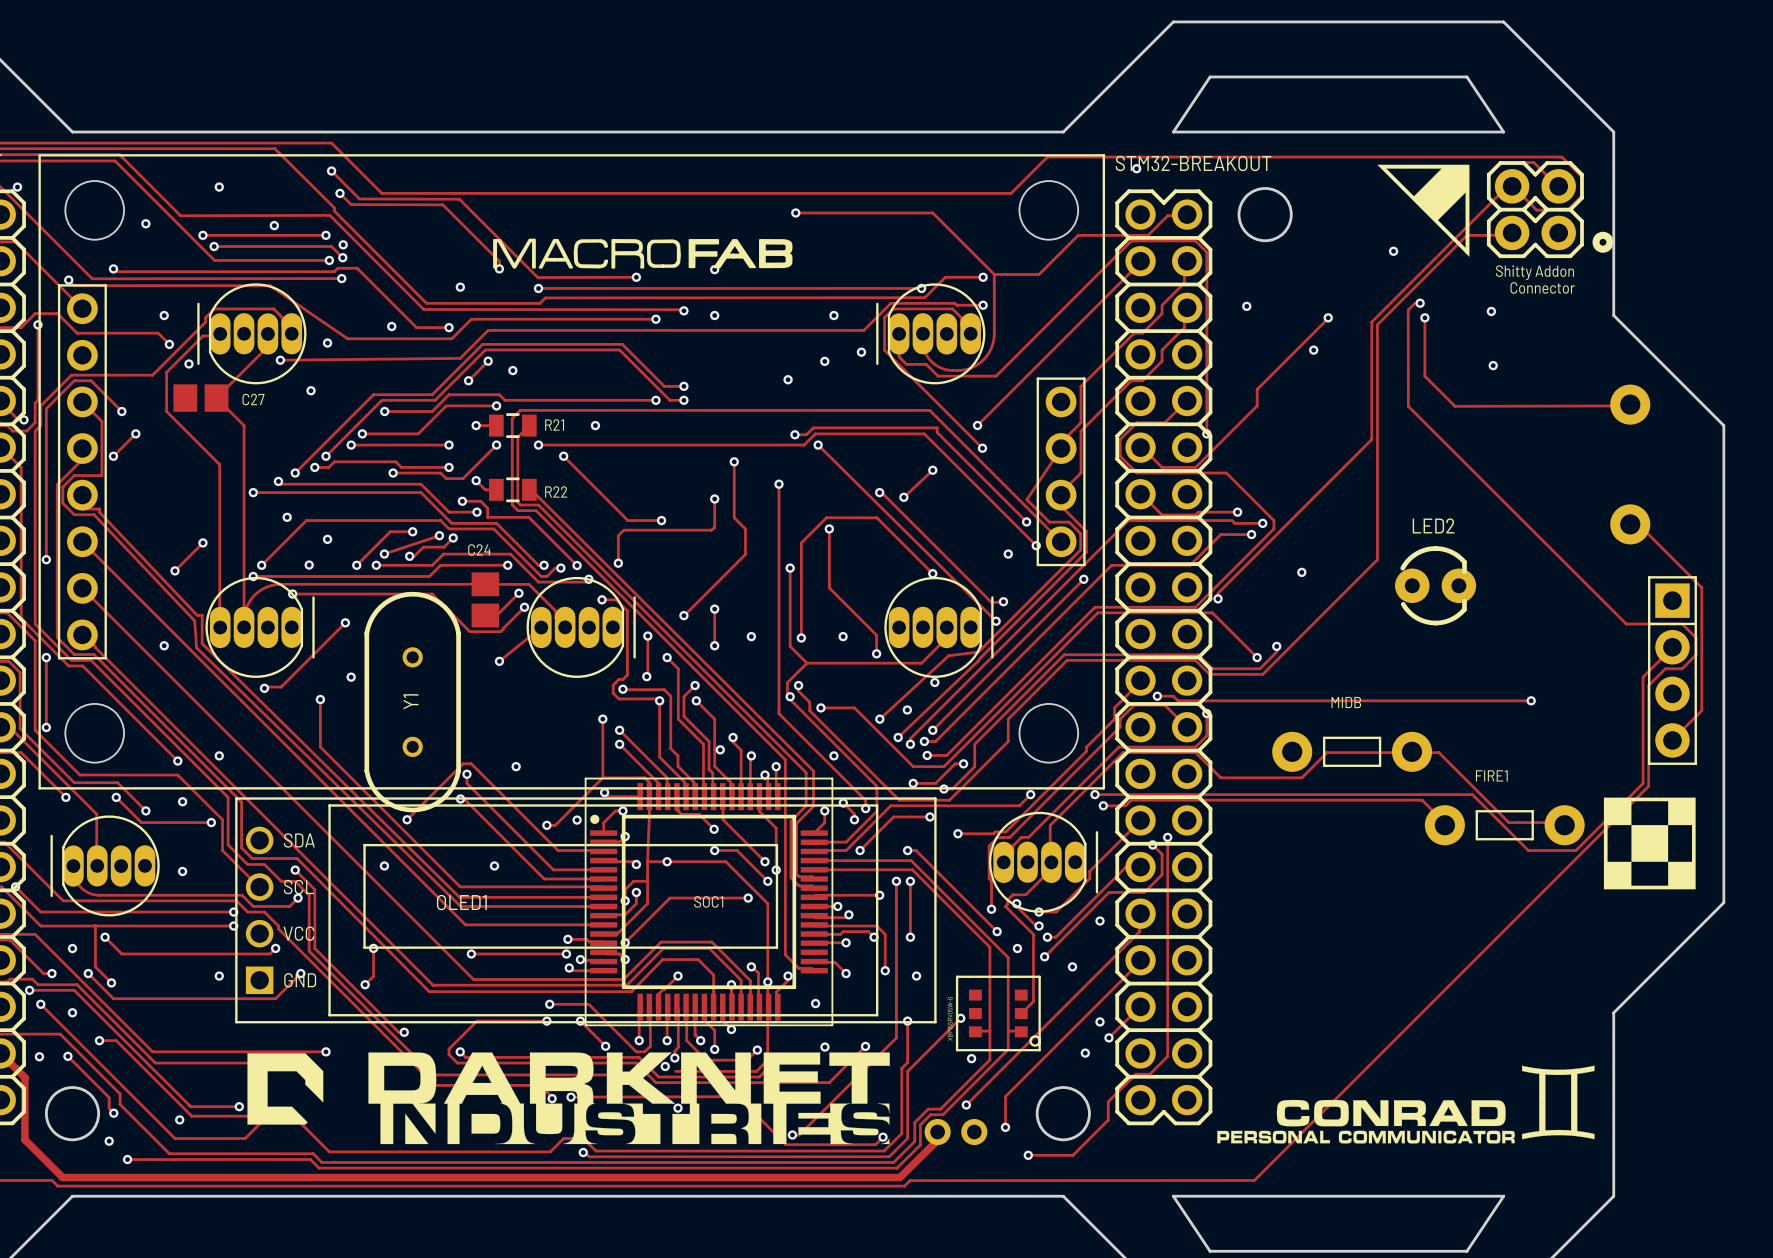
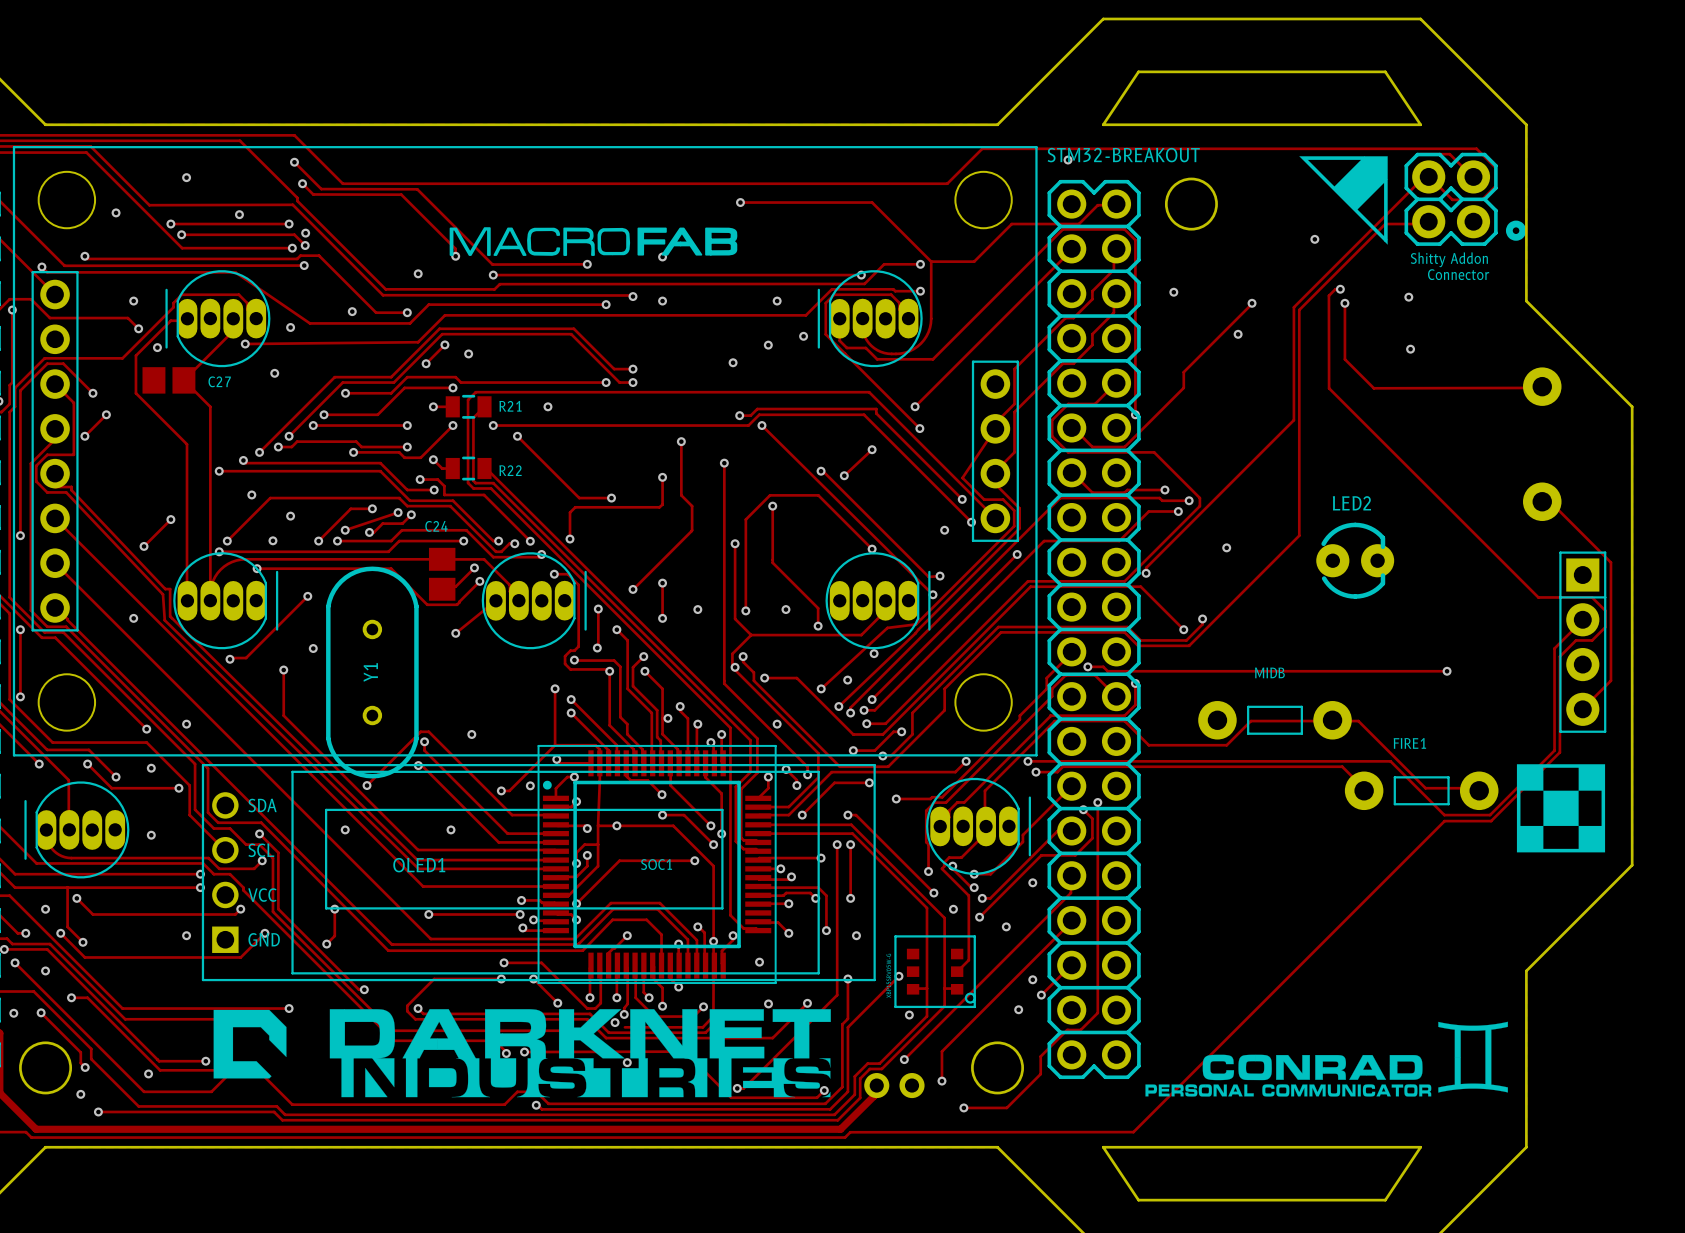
track: (1648, 785) (1254, 1180) (1204, 1180) -> (1559, 752) (1491, 821) (1444, 821) (1133, 1132)

